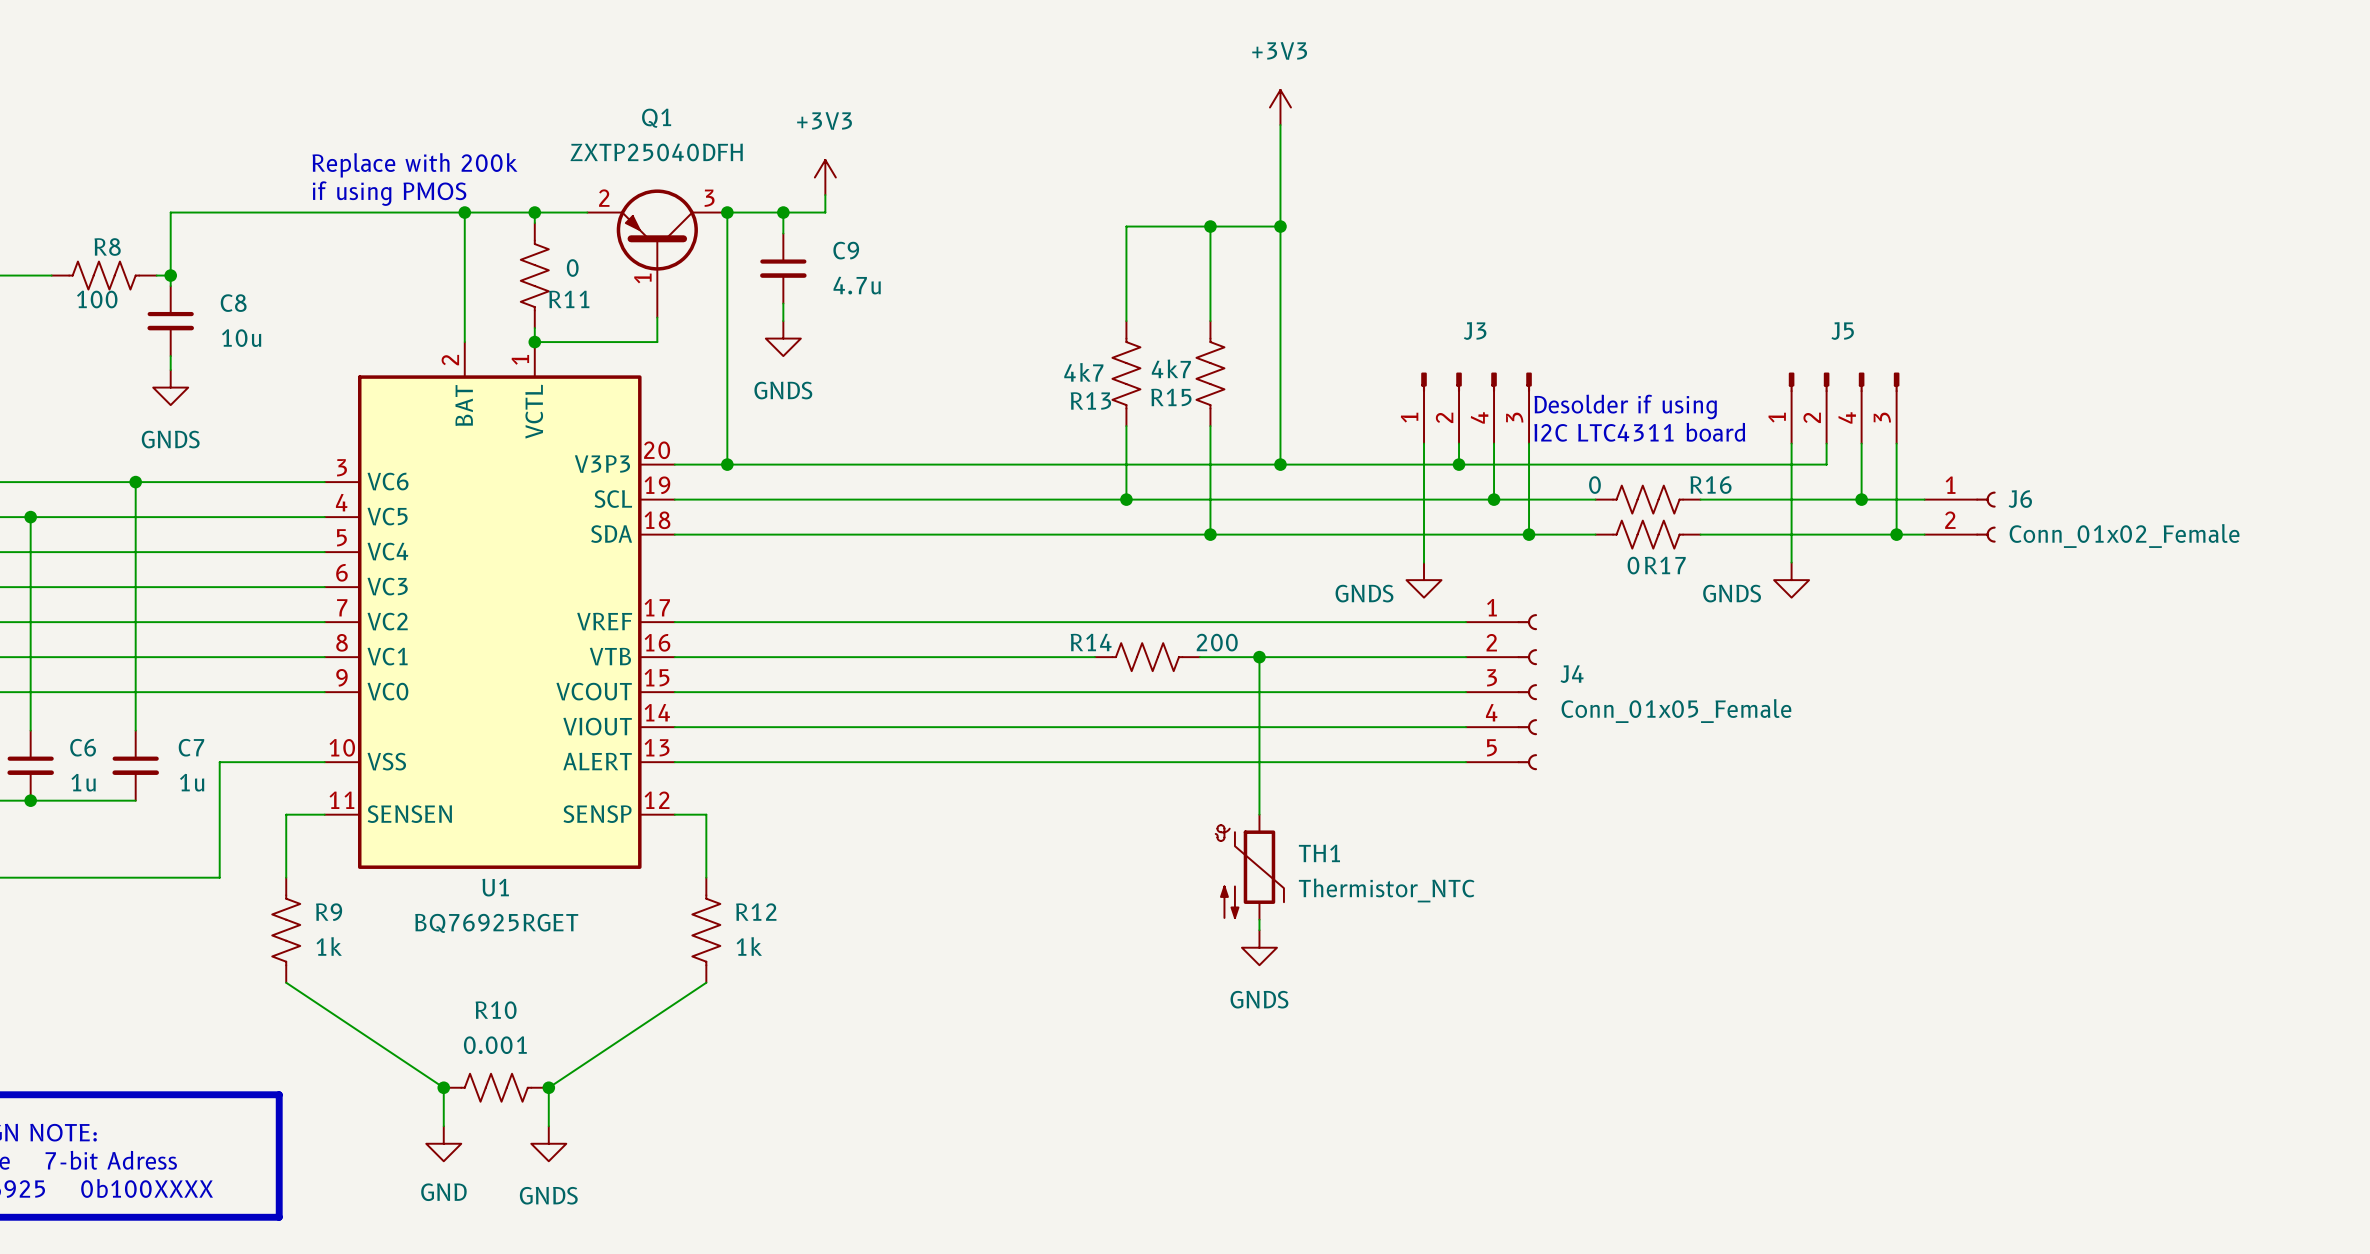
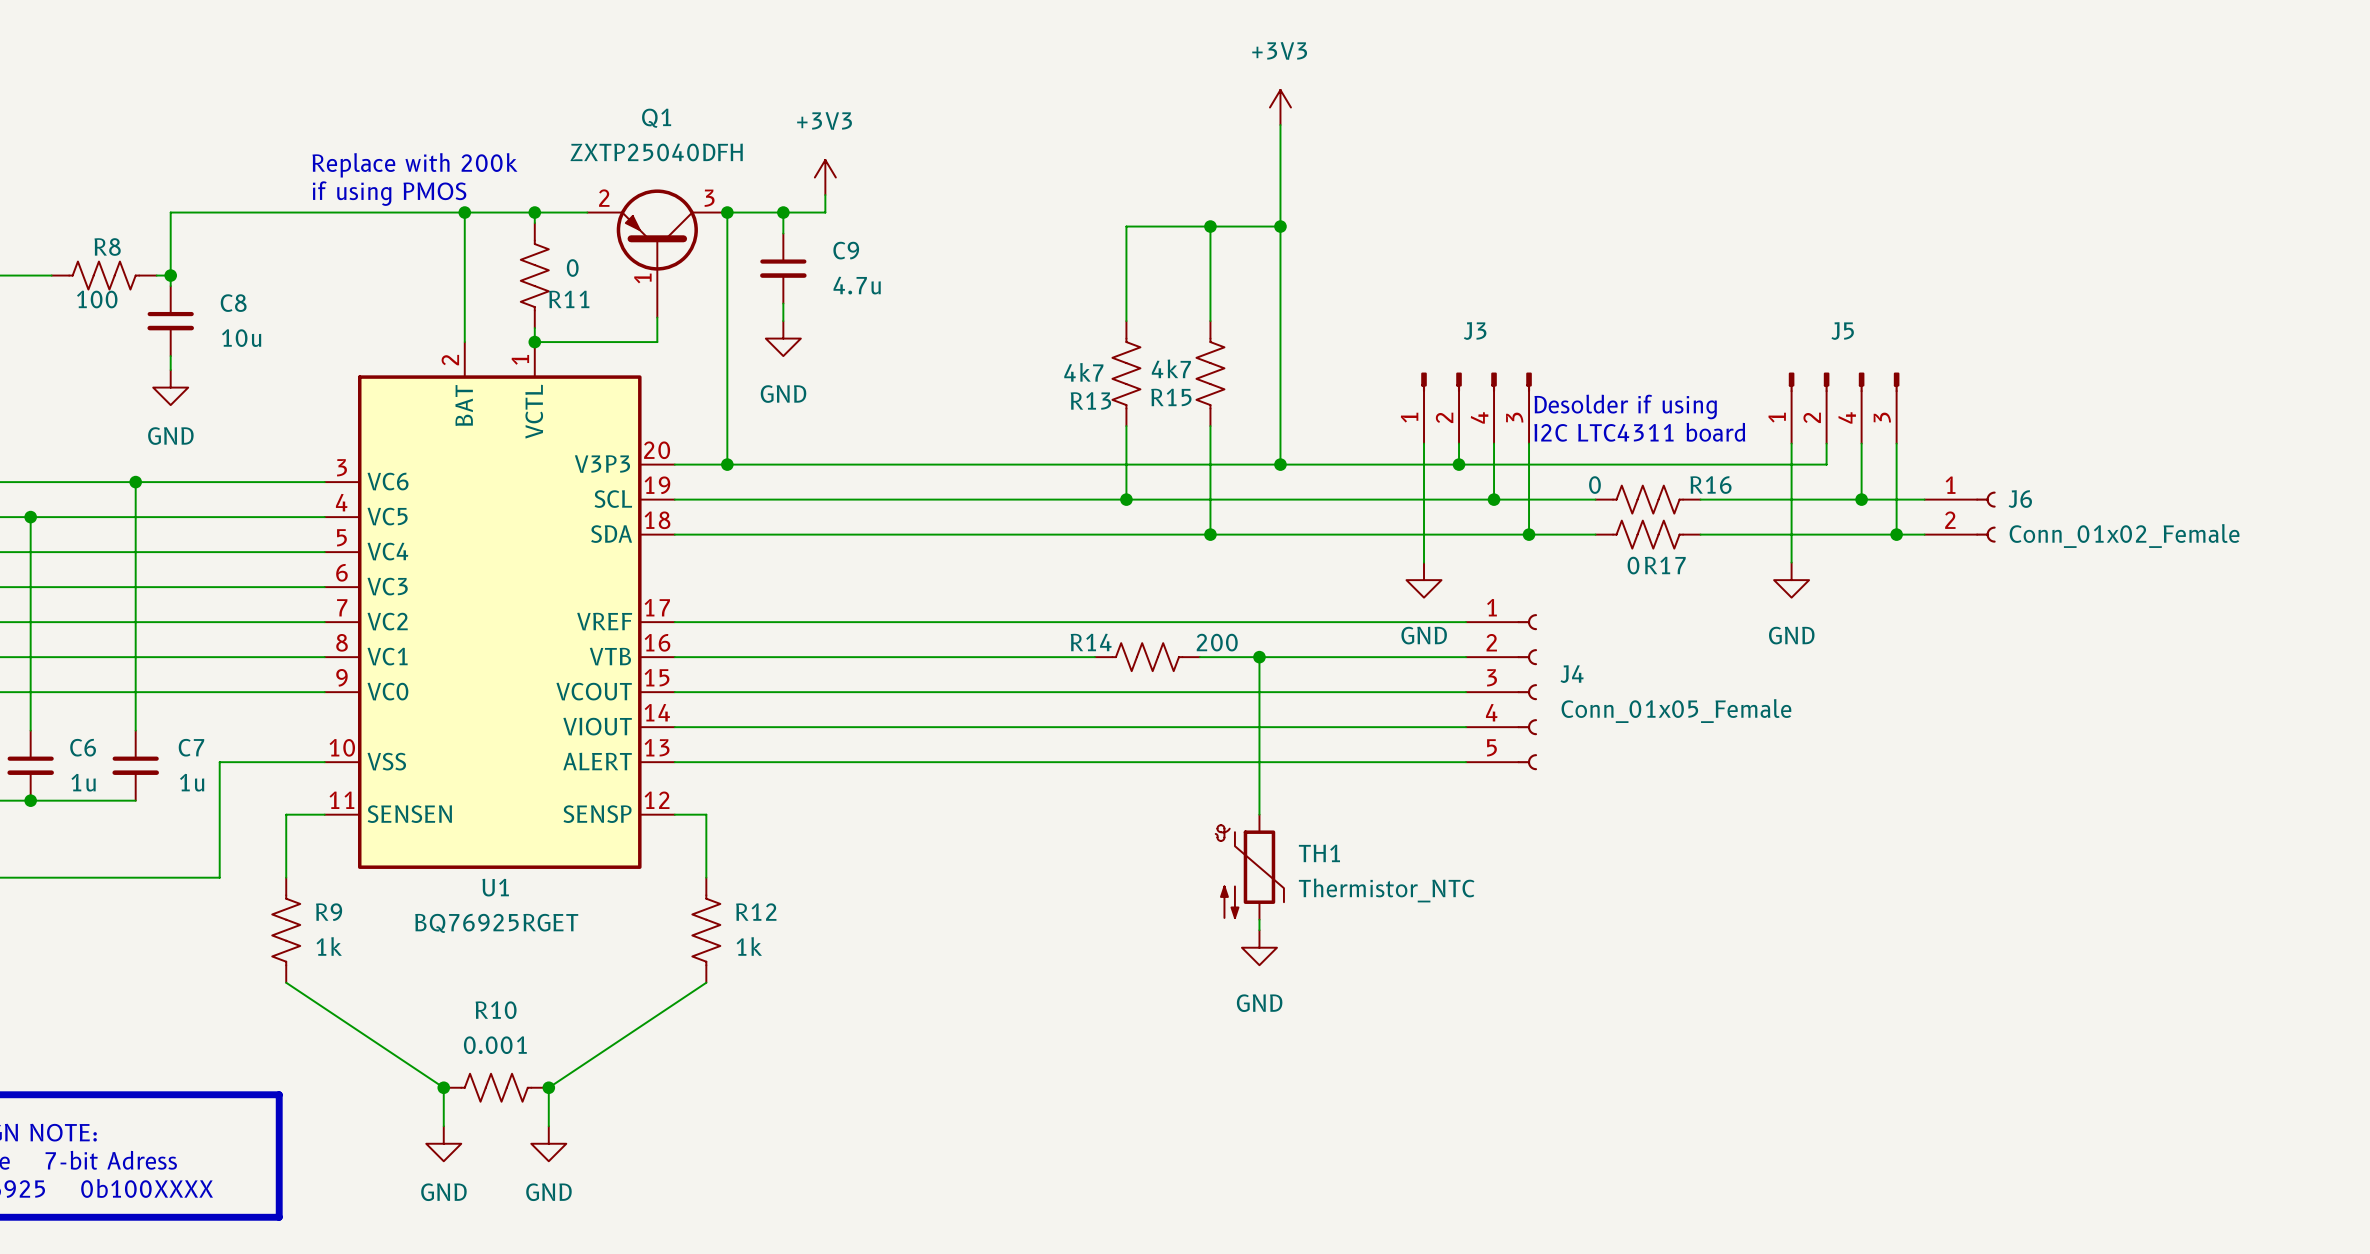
power symbol: GNDS (783, 338) -> GND (783, 338)
power symbol: GNDS (170, 387) -> GND (170, 387)
power symbol: GNDS (1424, 580) -> GND (1424, 580)
power symbol: GNDS (1791, 580) -> GND (1791, 580)
power symbol: GNDS (1259, 947) -> GND (1259, 947)
power symbol: GNDS (548, 1143) -> GND (548, 1143)

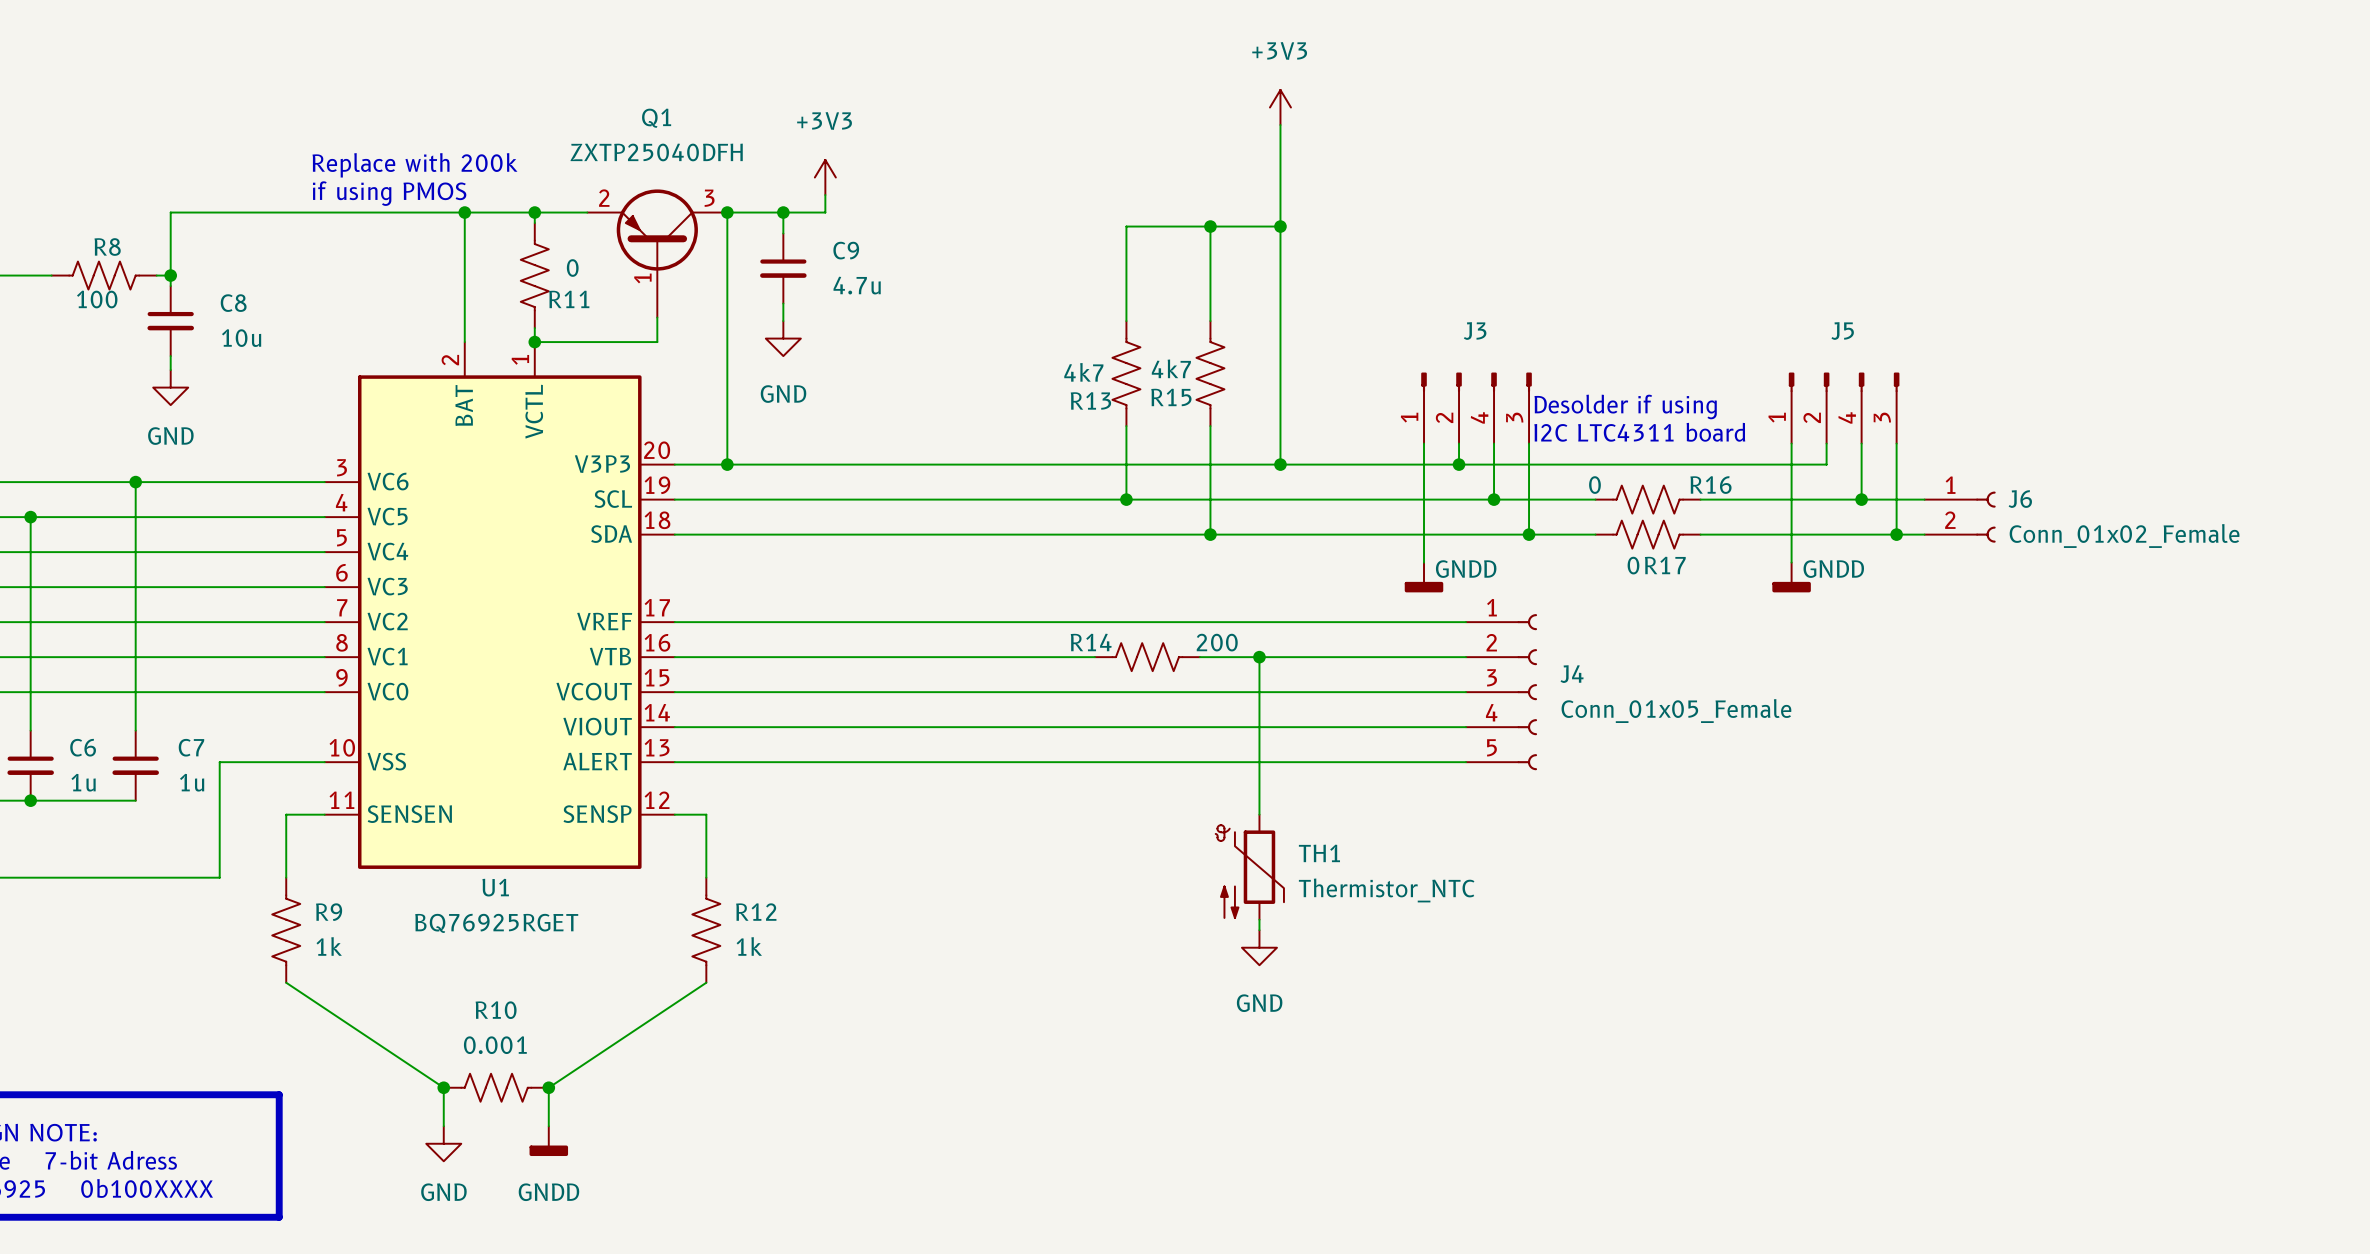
power symbol: GND (1424, 580) -> GNDD (1424, 577)
power symbol: GND (1791, 580) -> GNDD (1791, 577)
power symbol: GND (548, 1143) -> GNDD (548, 1141)

